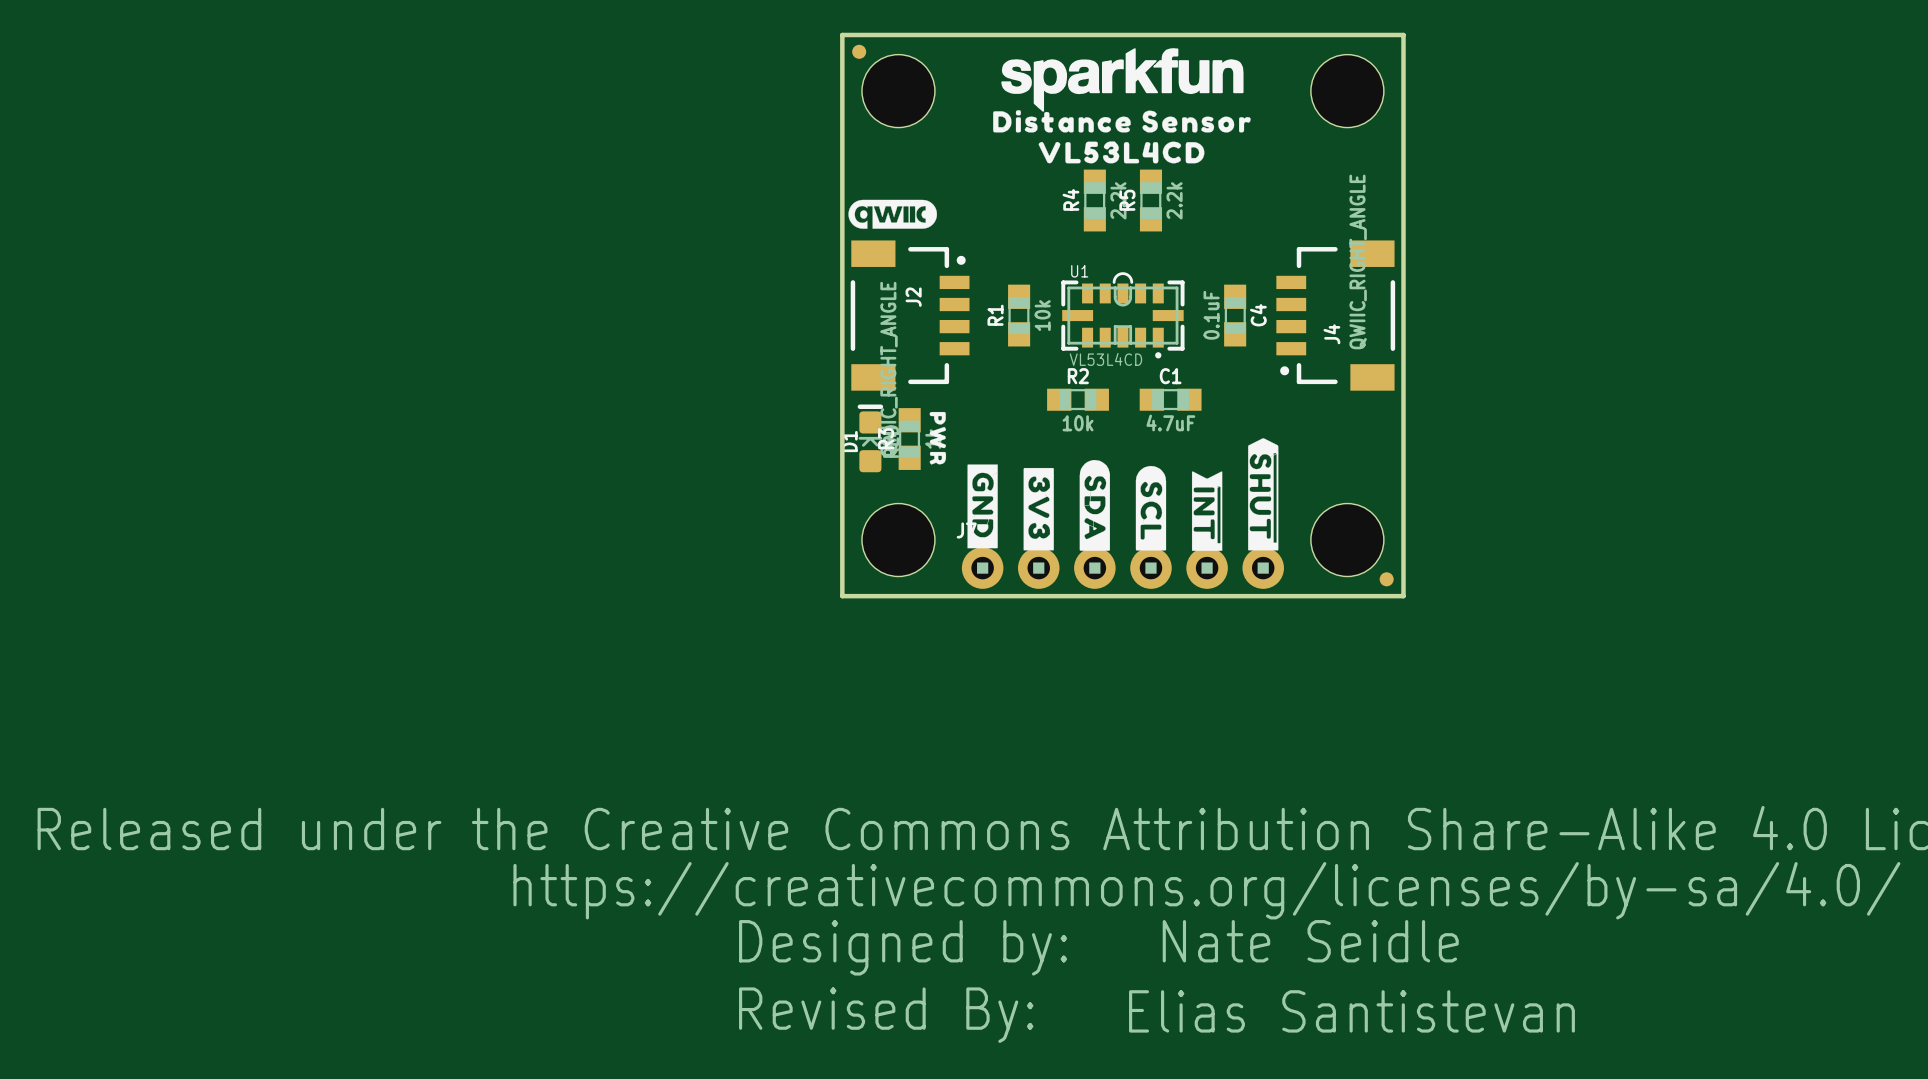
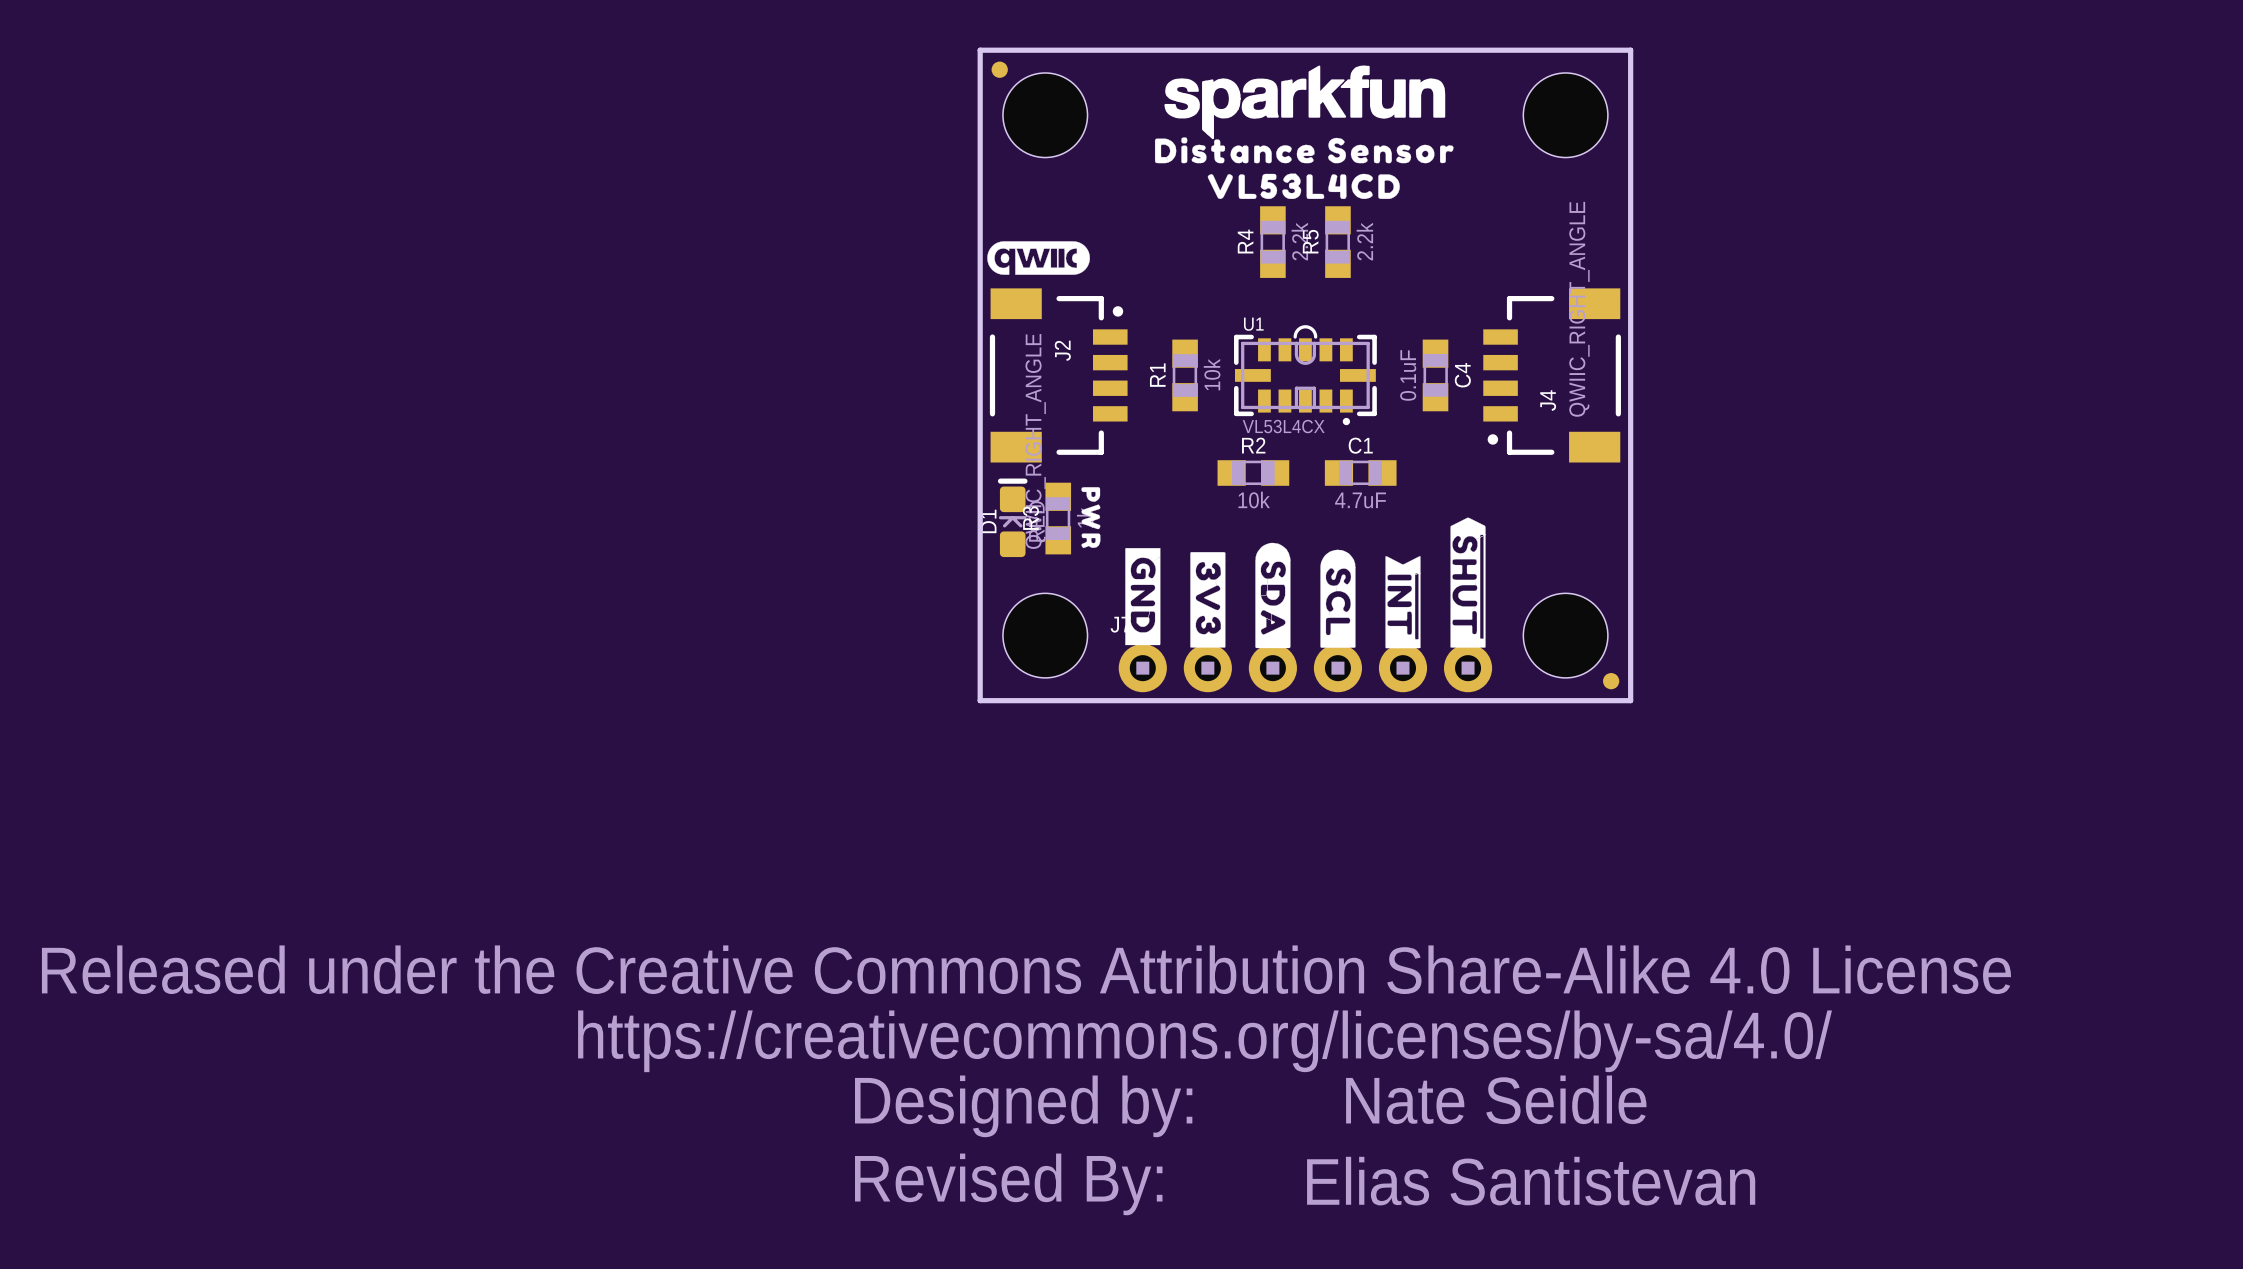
U1 value: VL53L4CD (1105, 359) -> VL53L4CX (1283, 426)

